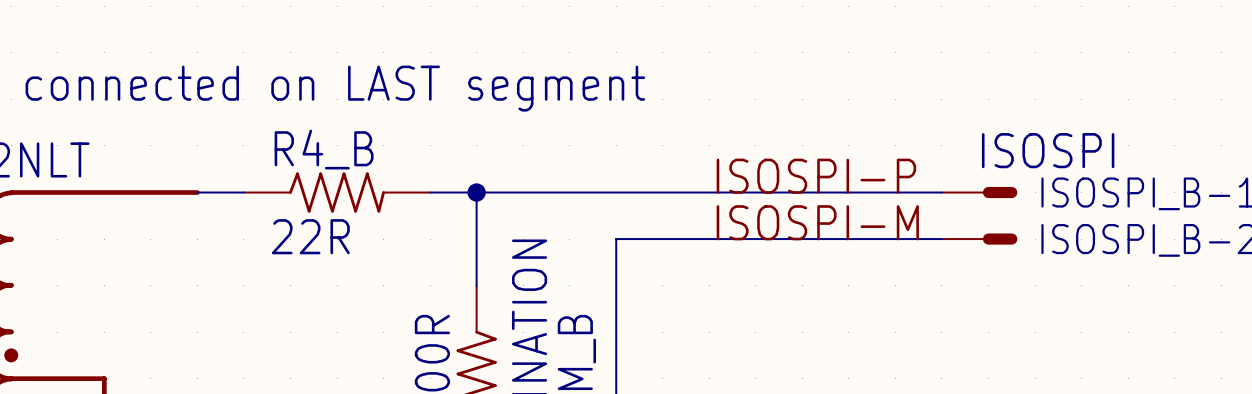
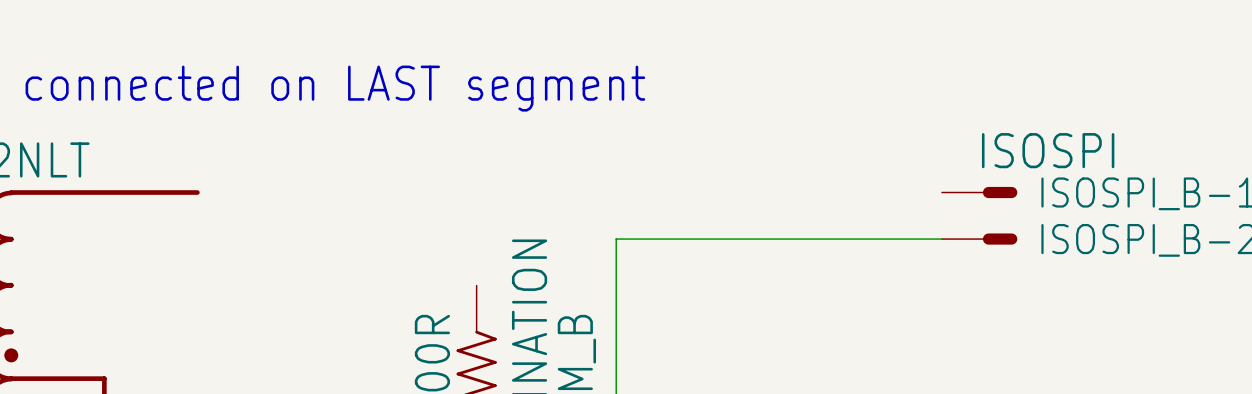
label: ISOSPI-P (816, 176) -> none
wire: (197, 192) (243, 192) -> none
R4_B: 22R (337, 192) -> none
wire: (430, 192) (941, 192) -> none
wire: (476, 192) (476, 285) -> none
junction: (476, 192) -> none
label: ISOSPI-M (817, 222) -> none

